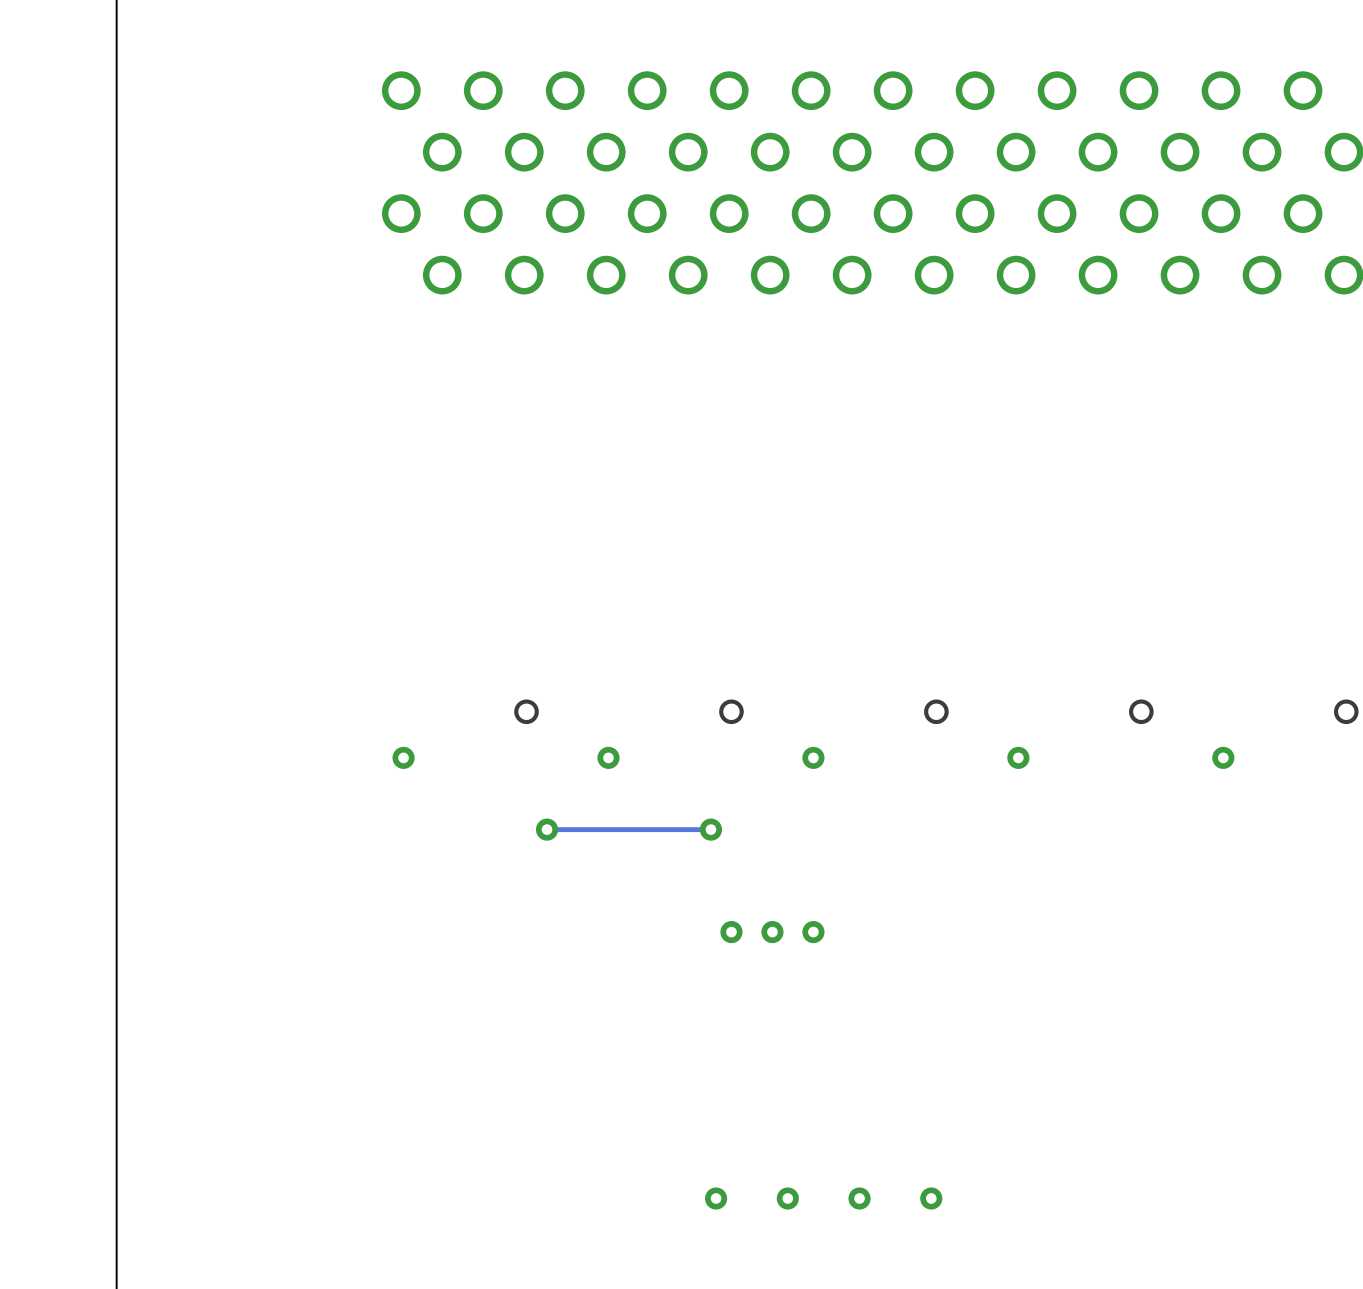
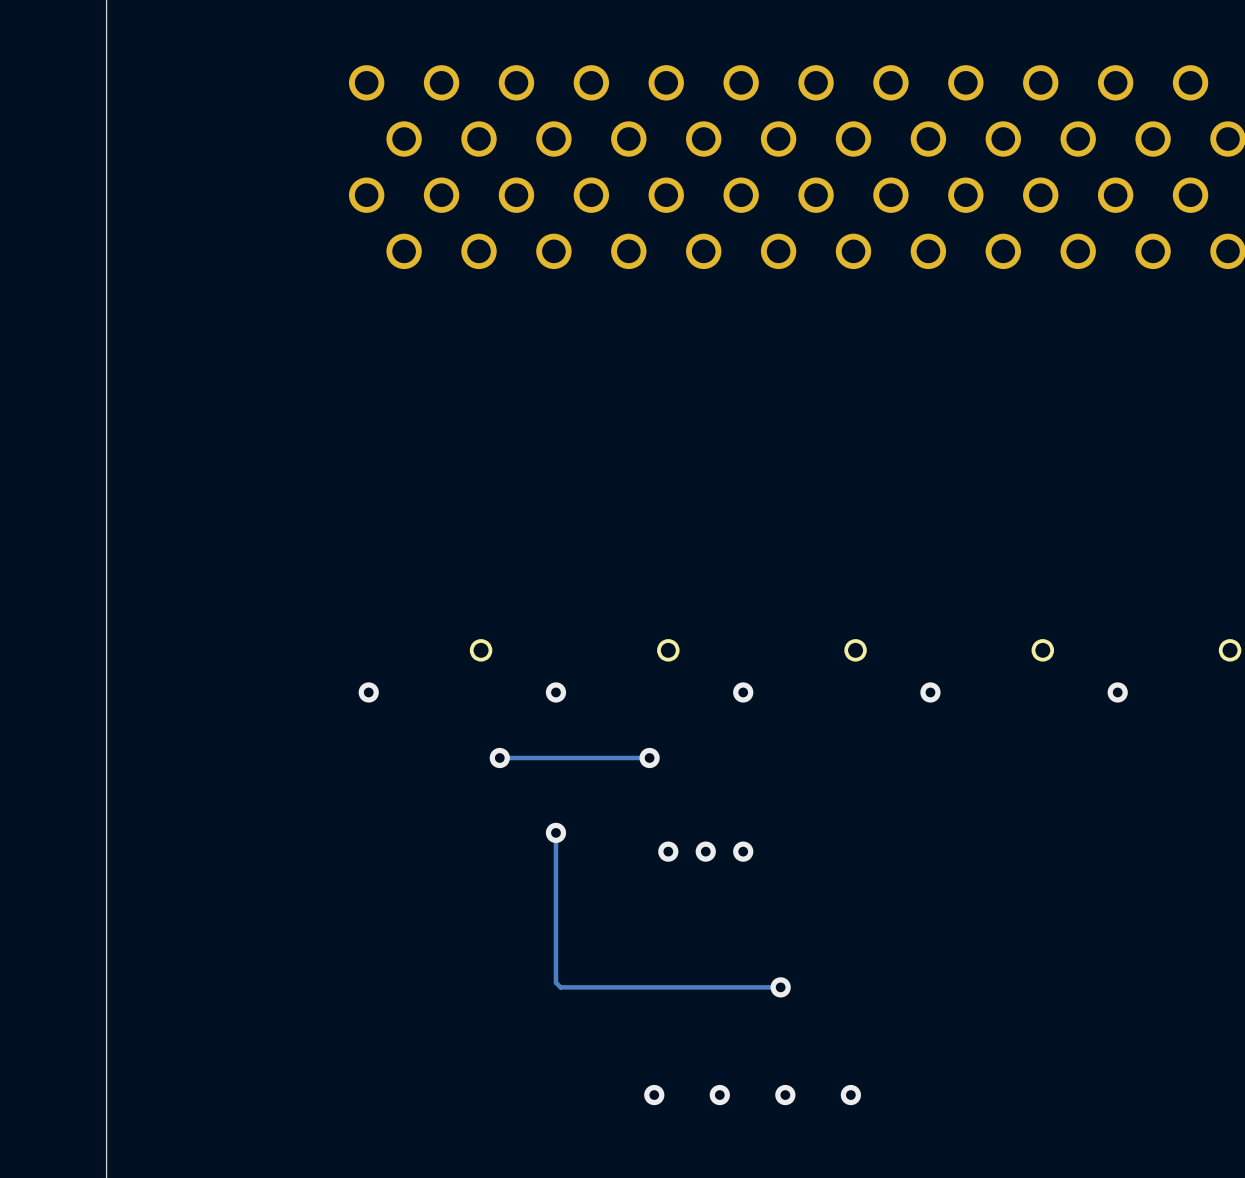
track: none -> (555, 832) (555, 982) (560, 987) (780, 987)
via: none -> (555, 832)
via: none -> (780, 987)

